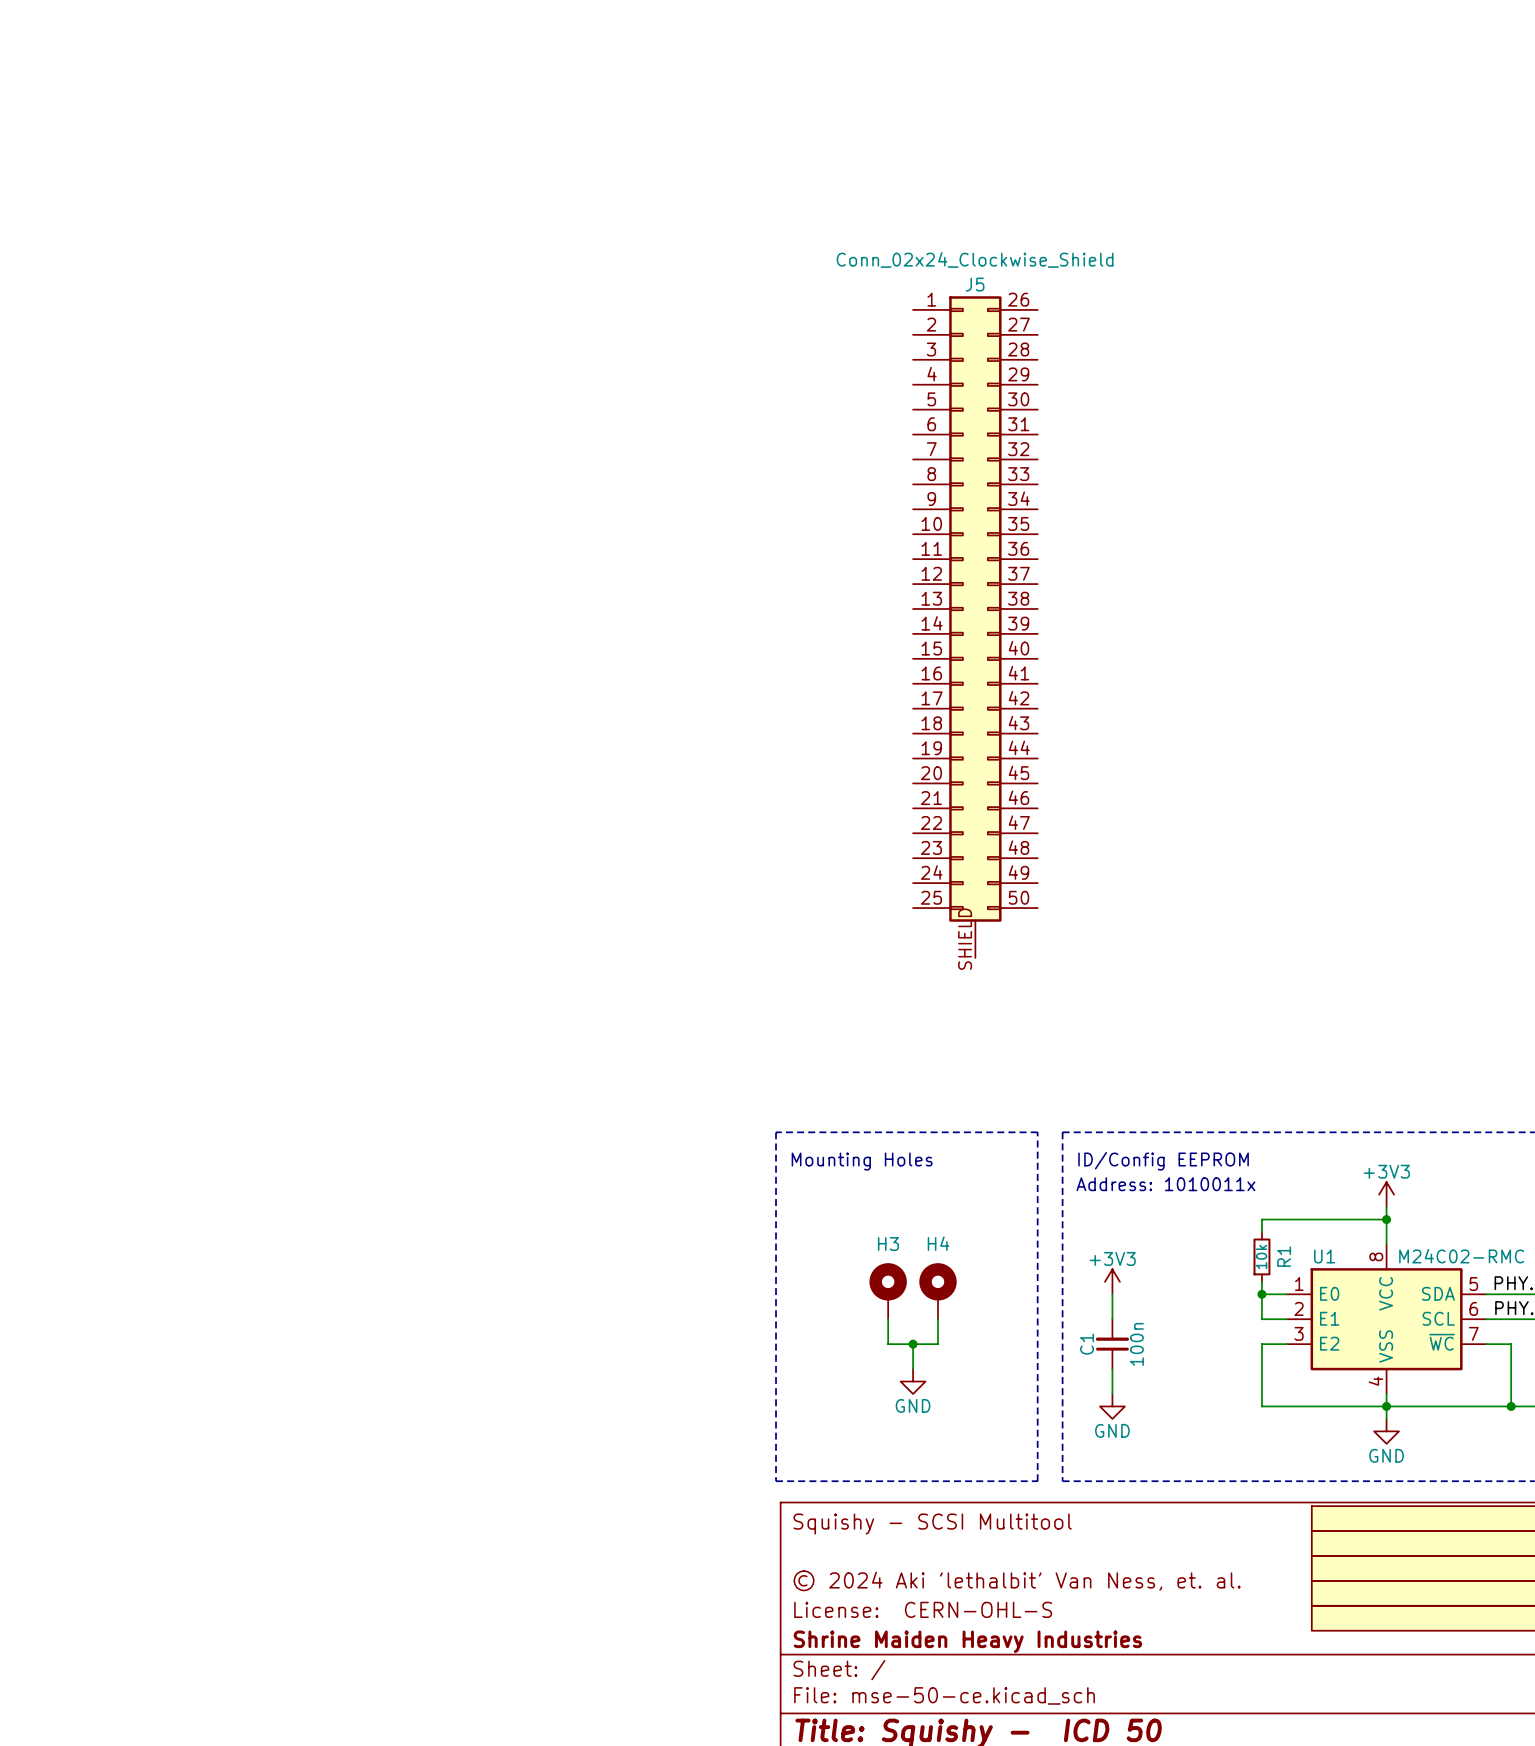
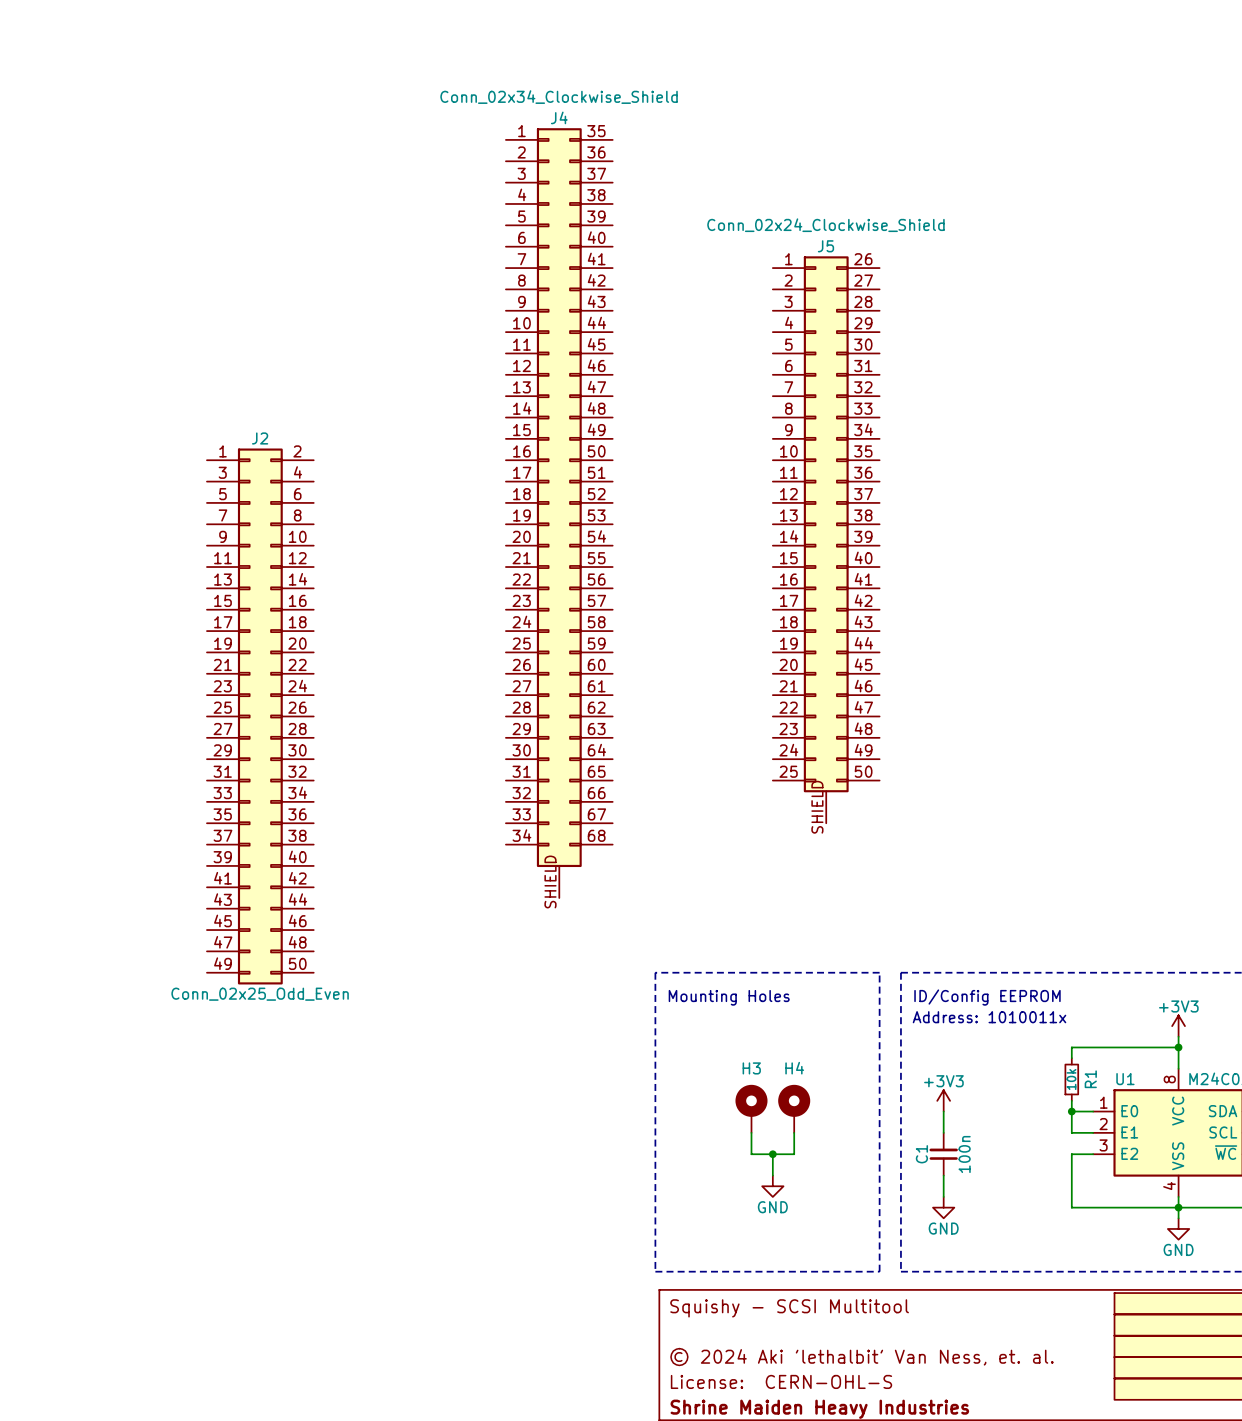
J4: none -> Conn_02x34_Clockwise_Shield (559, 513)
J2: none -> Conn_02x25_Odd_Even (260, 716)

